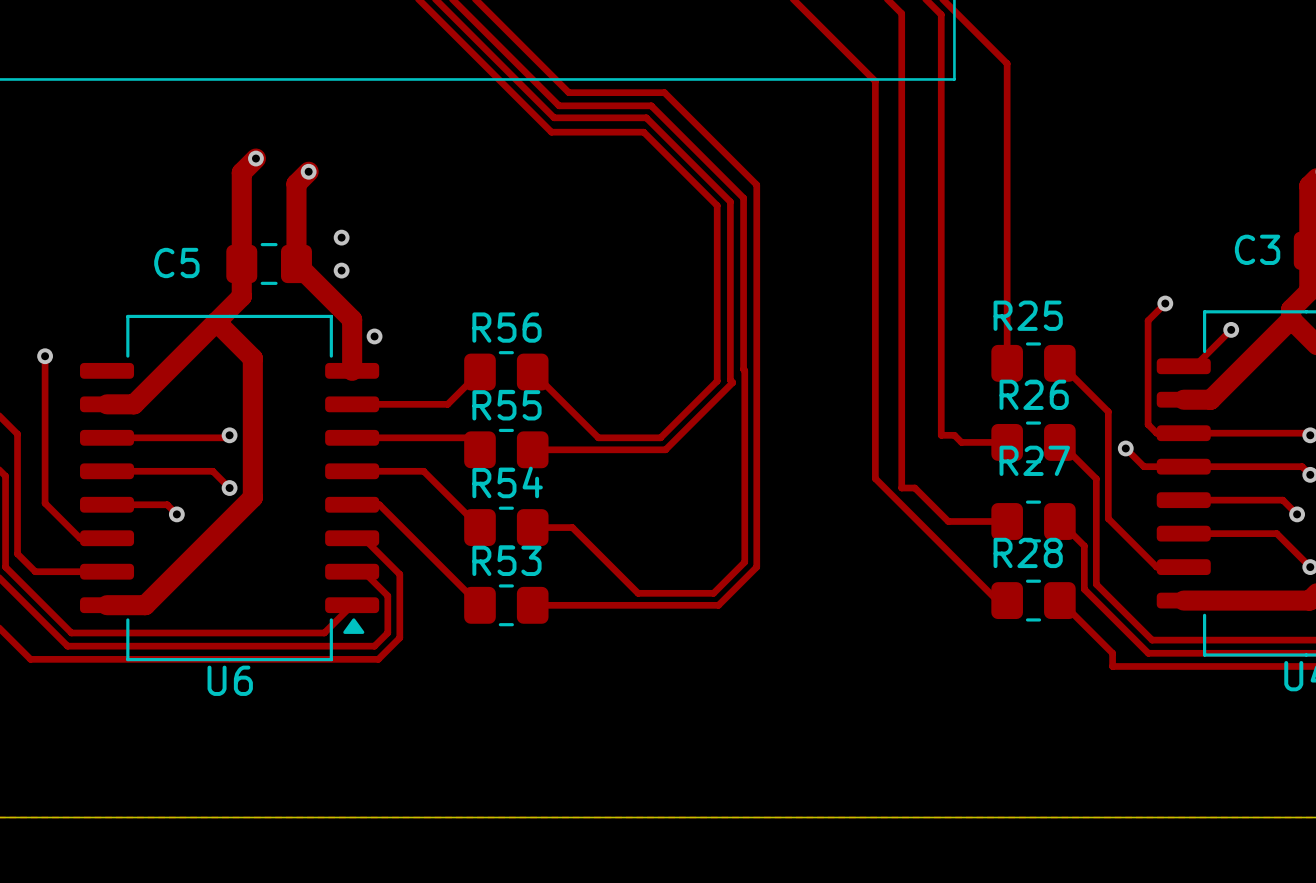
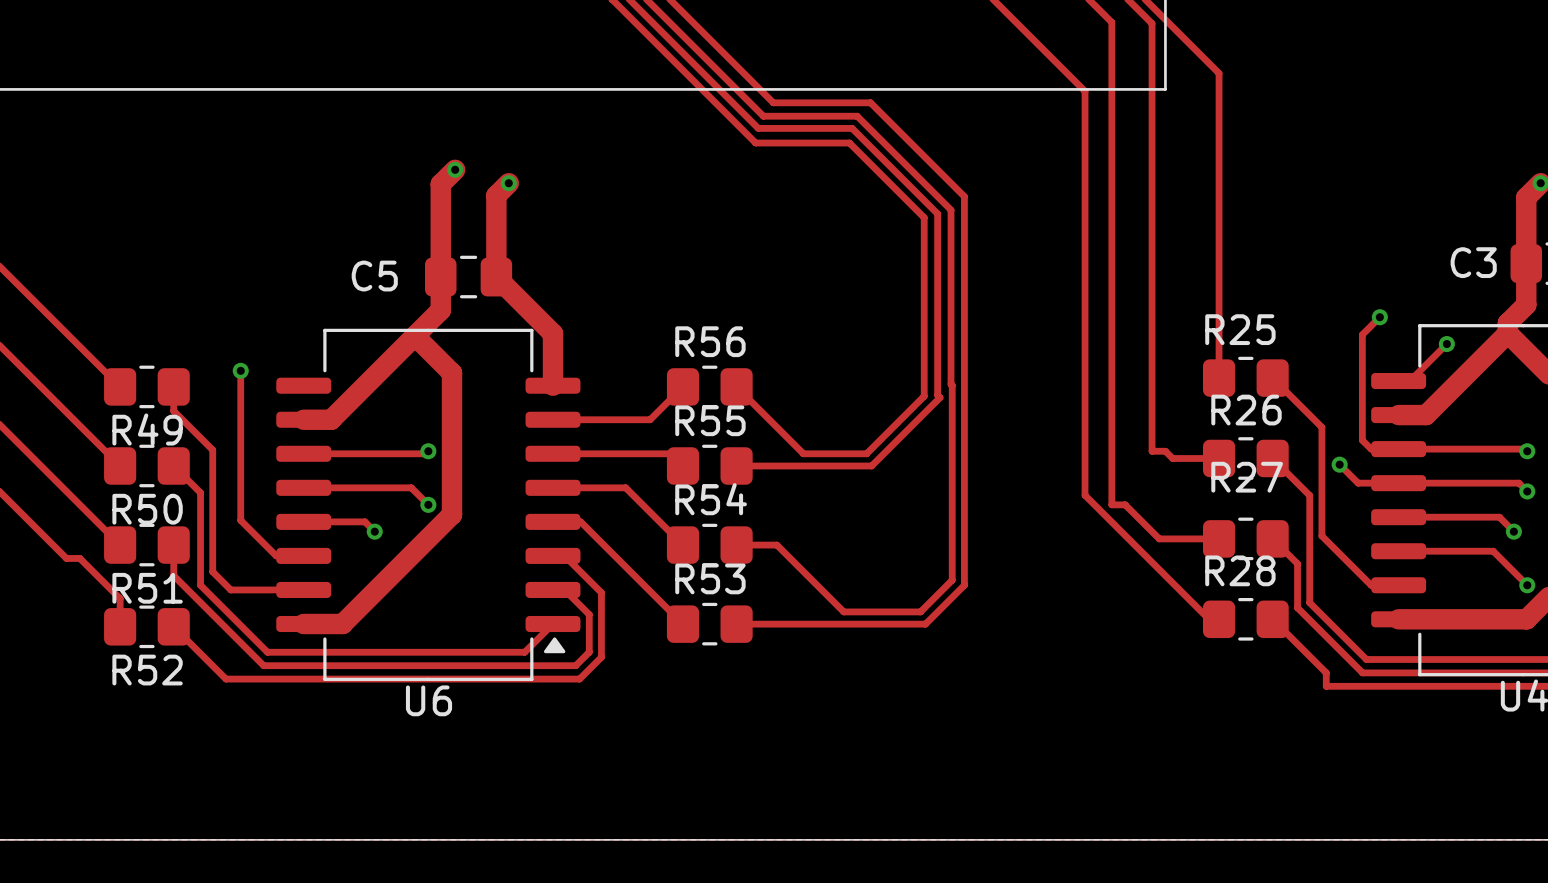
via: (341, 237) -> none
via: (341, 270) -> none
via: (374, 336) -> none

